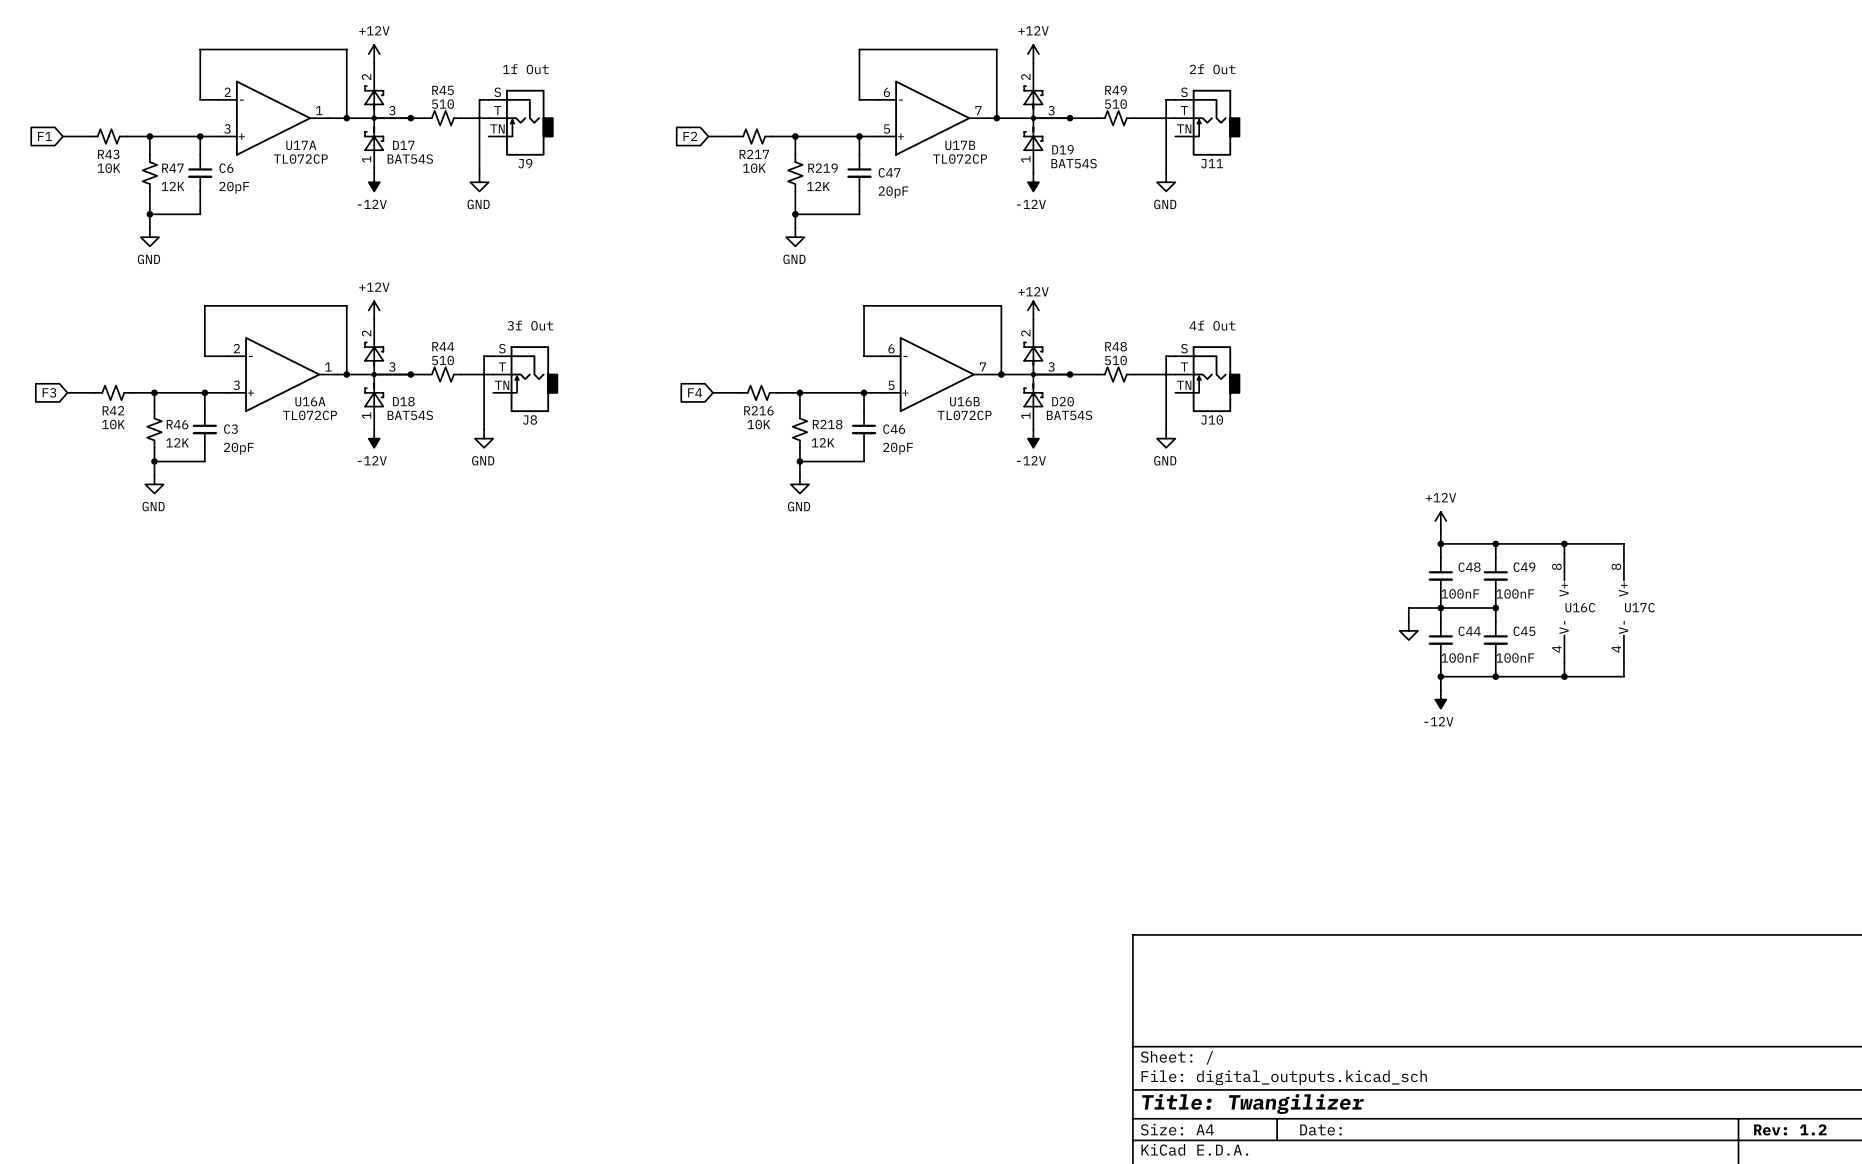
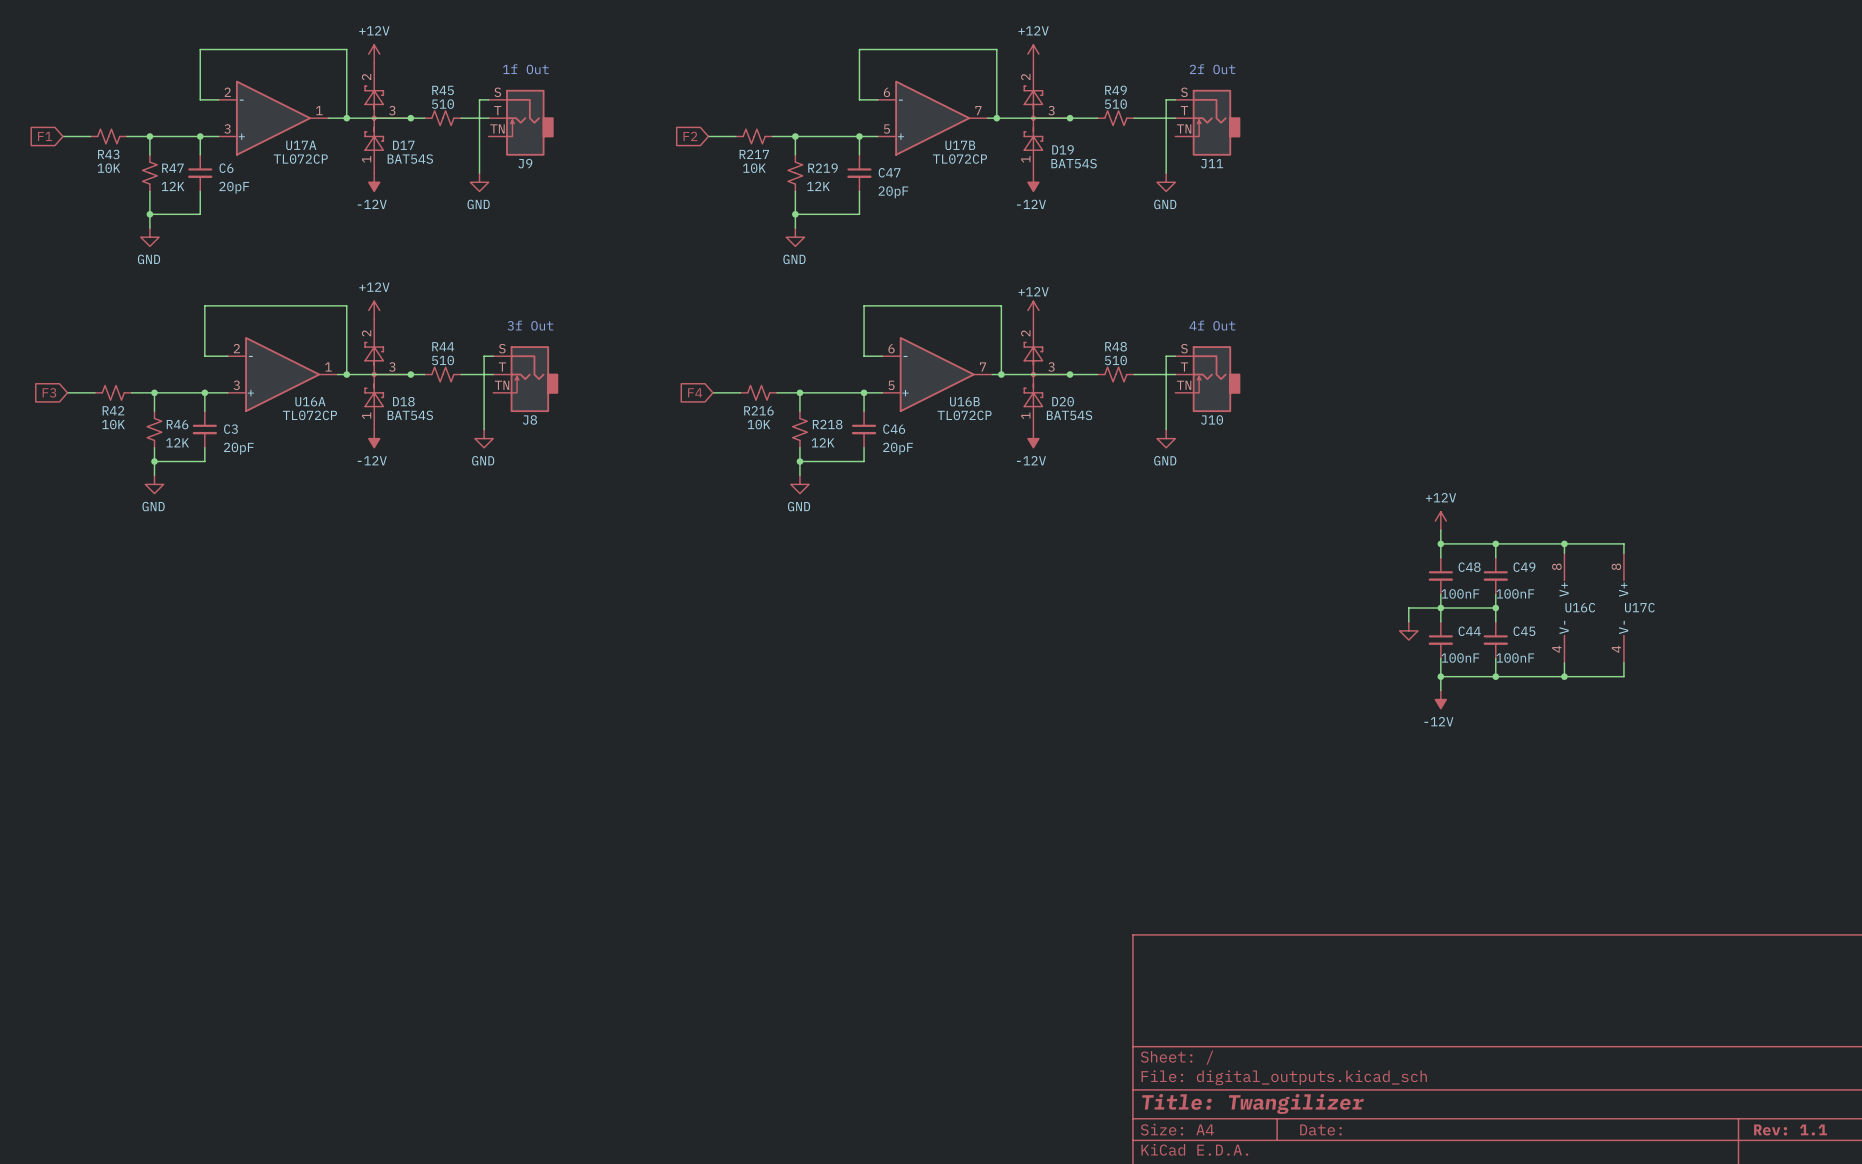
title block: Rev: 1.2 (1790, 1129) -> Rev: 1.1 (1790, 1129)

